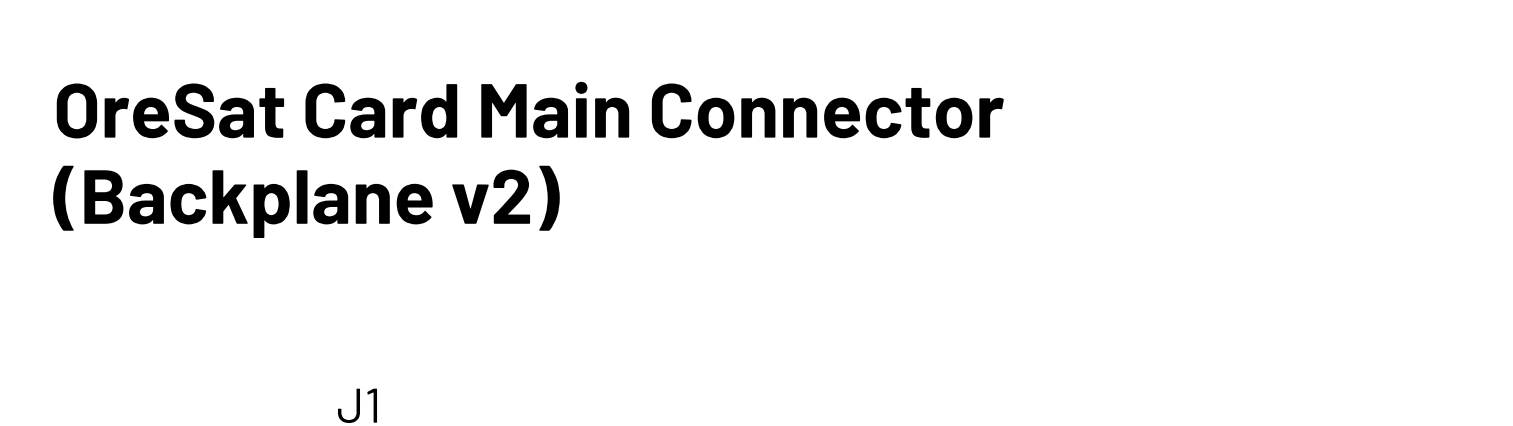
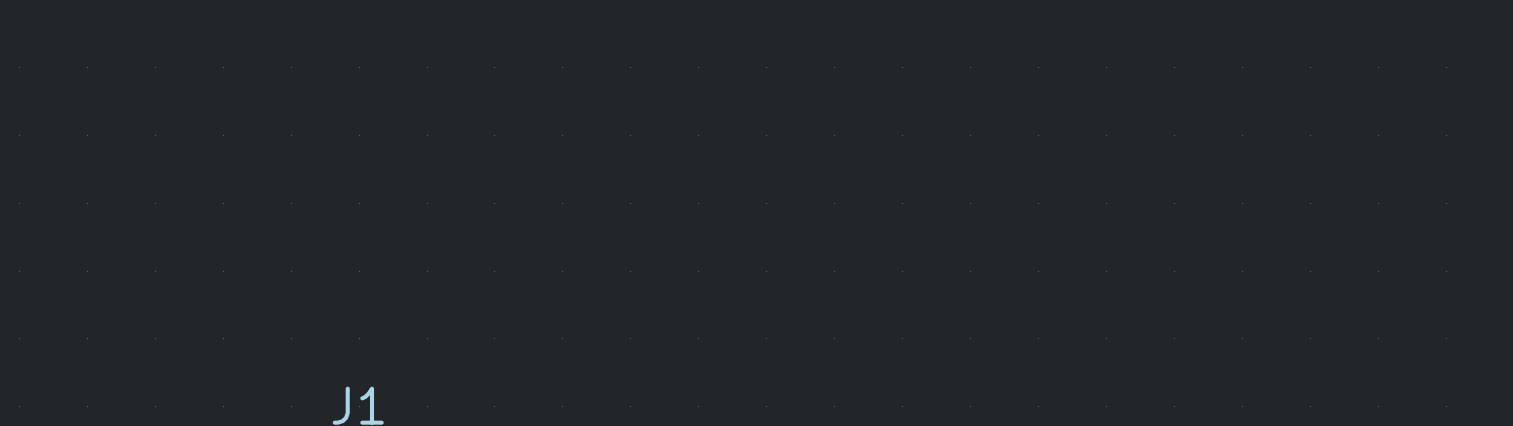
text: OreSat Card Main Connector (530, 110) -> none
text: (Backplane v2) (306, 201) -> none

